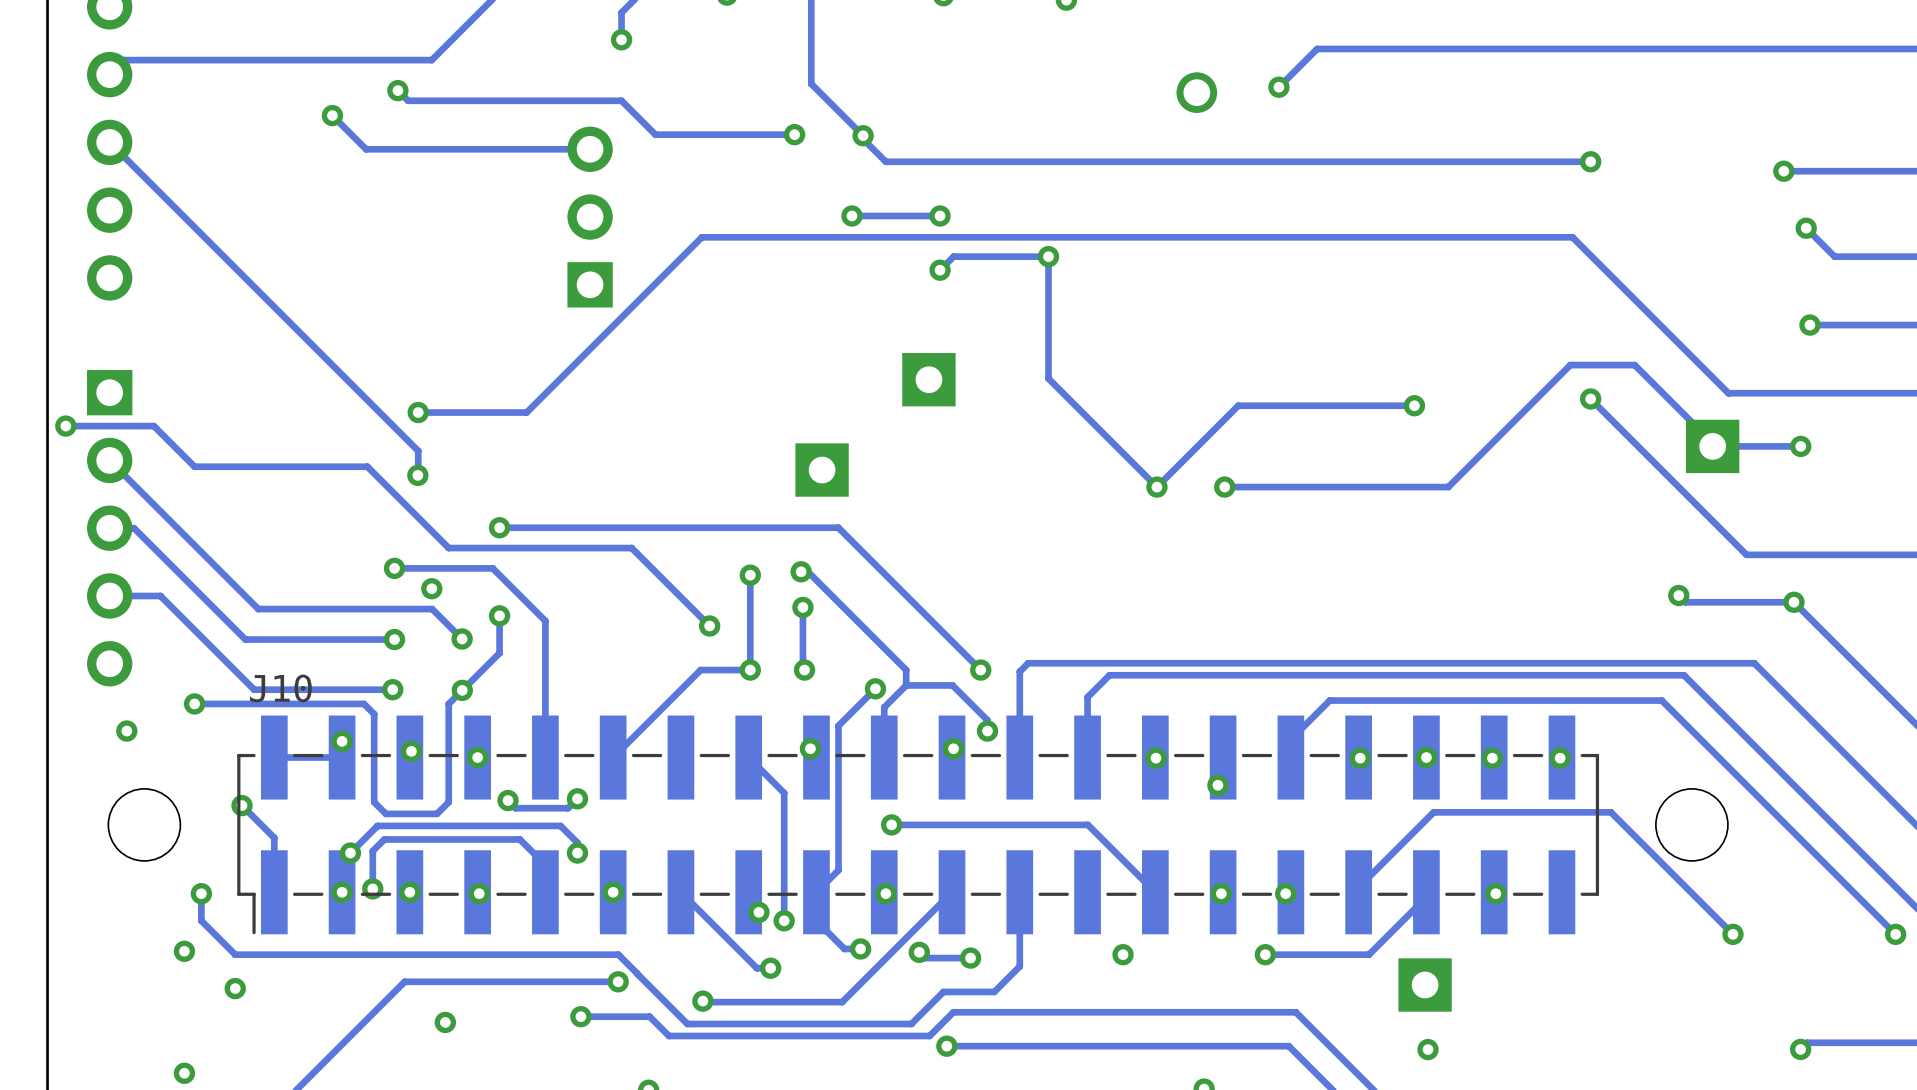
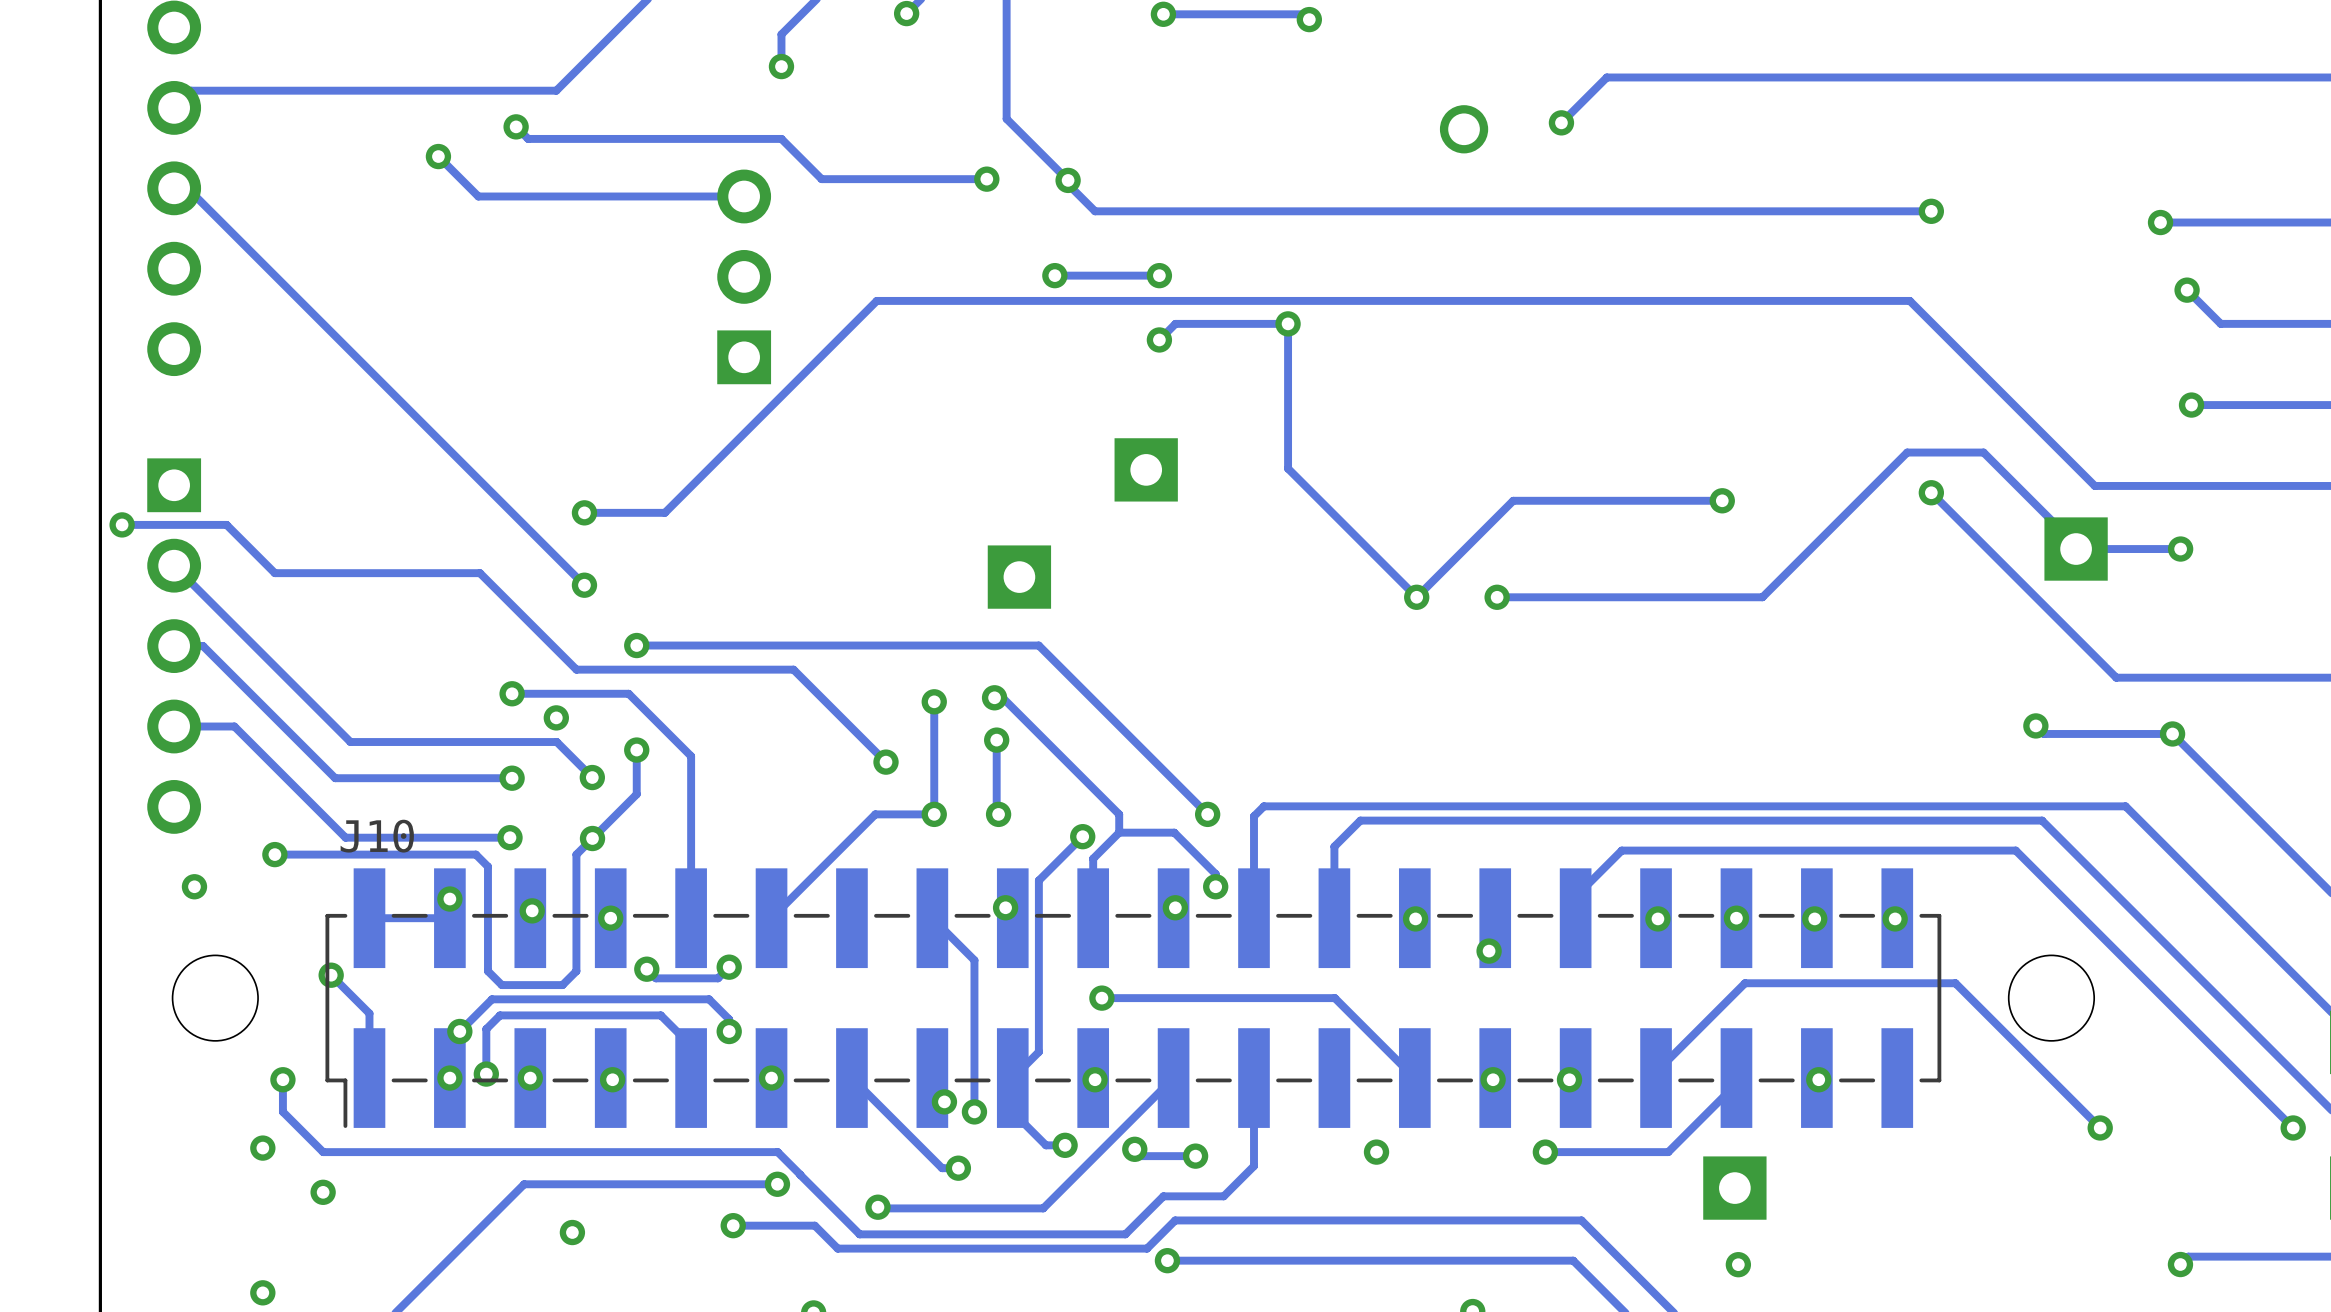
track: (109, 142) (418, 450) (418, 480) -> (174, 188) (187, 188) (584, 585)
via: (418, 412) -> none
track: (526, 412) (418, 412) -> (668, 508) (664, 512) (584, 512)
via: none -> (584, 512)
via: (417, 475) -> none
via: none -> (584, 585)

